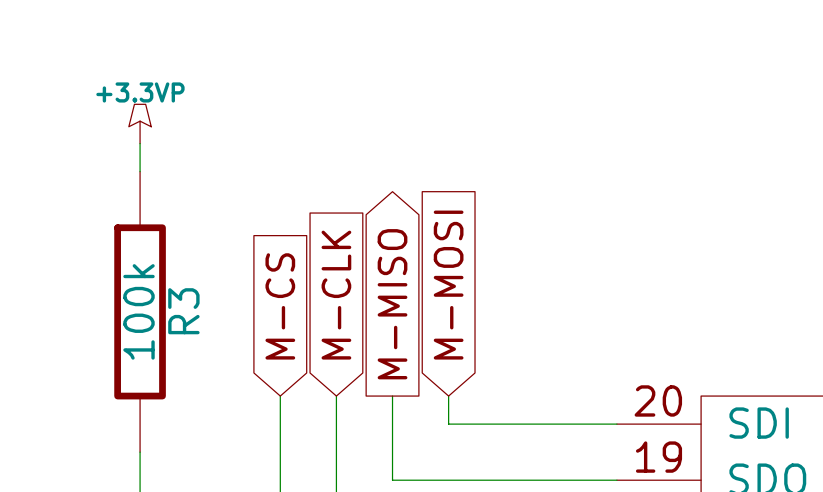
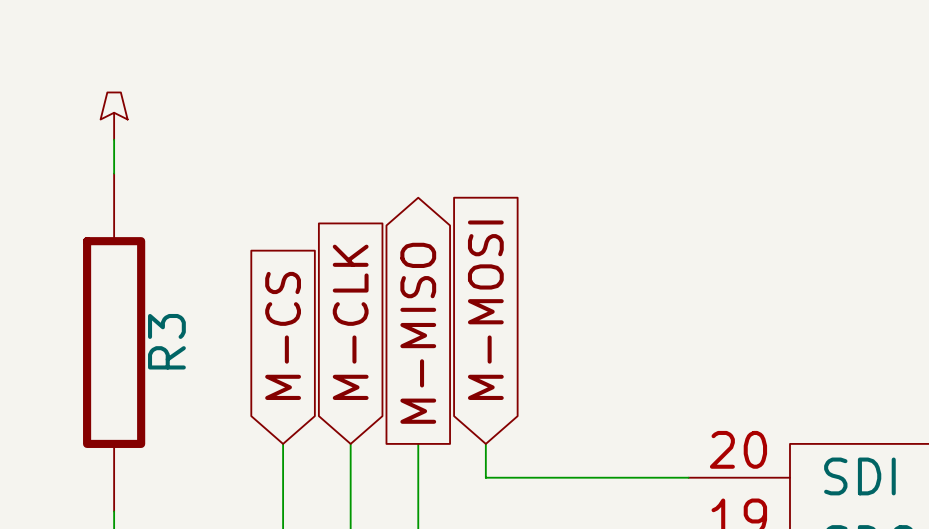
power symbol text: +3.3VP (140, 92) -> none
R3 value: 100k (139, 311) -> none

